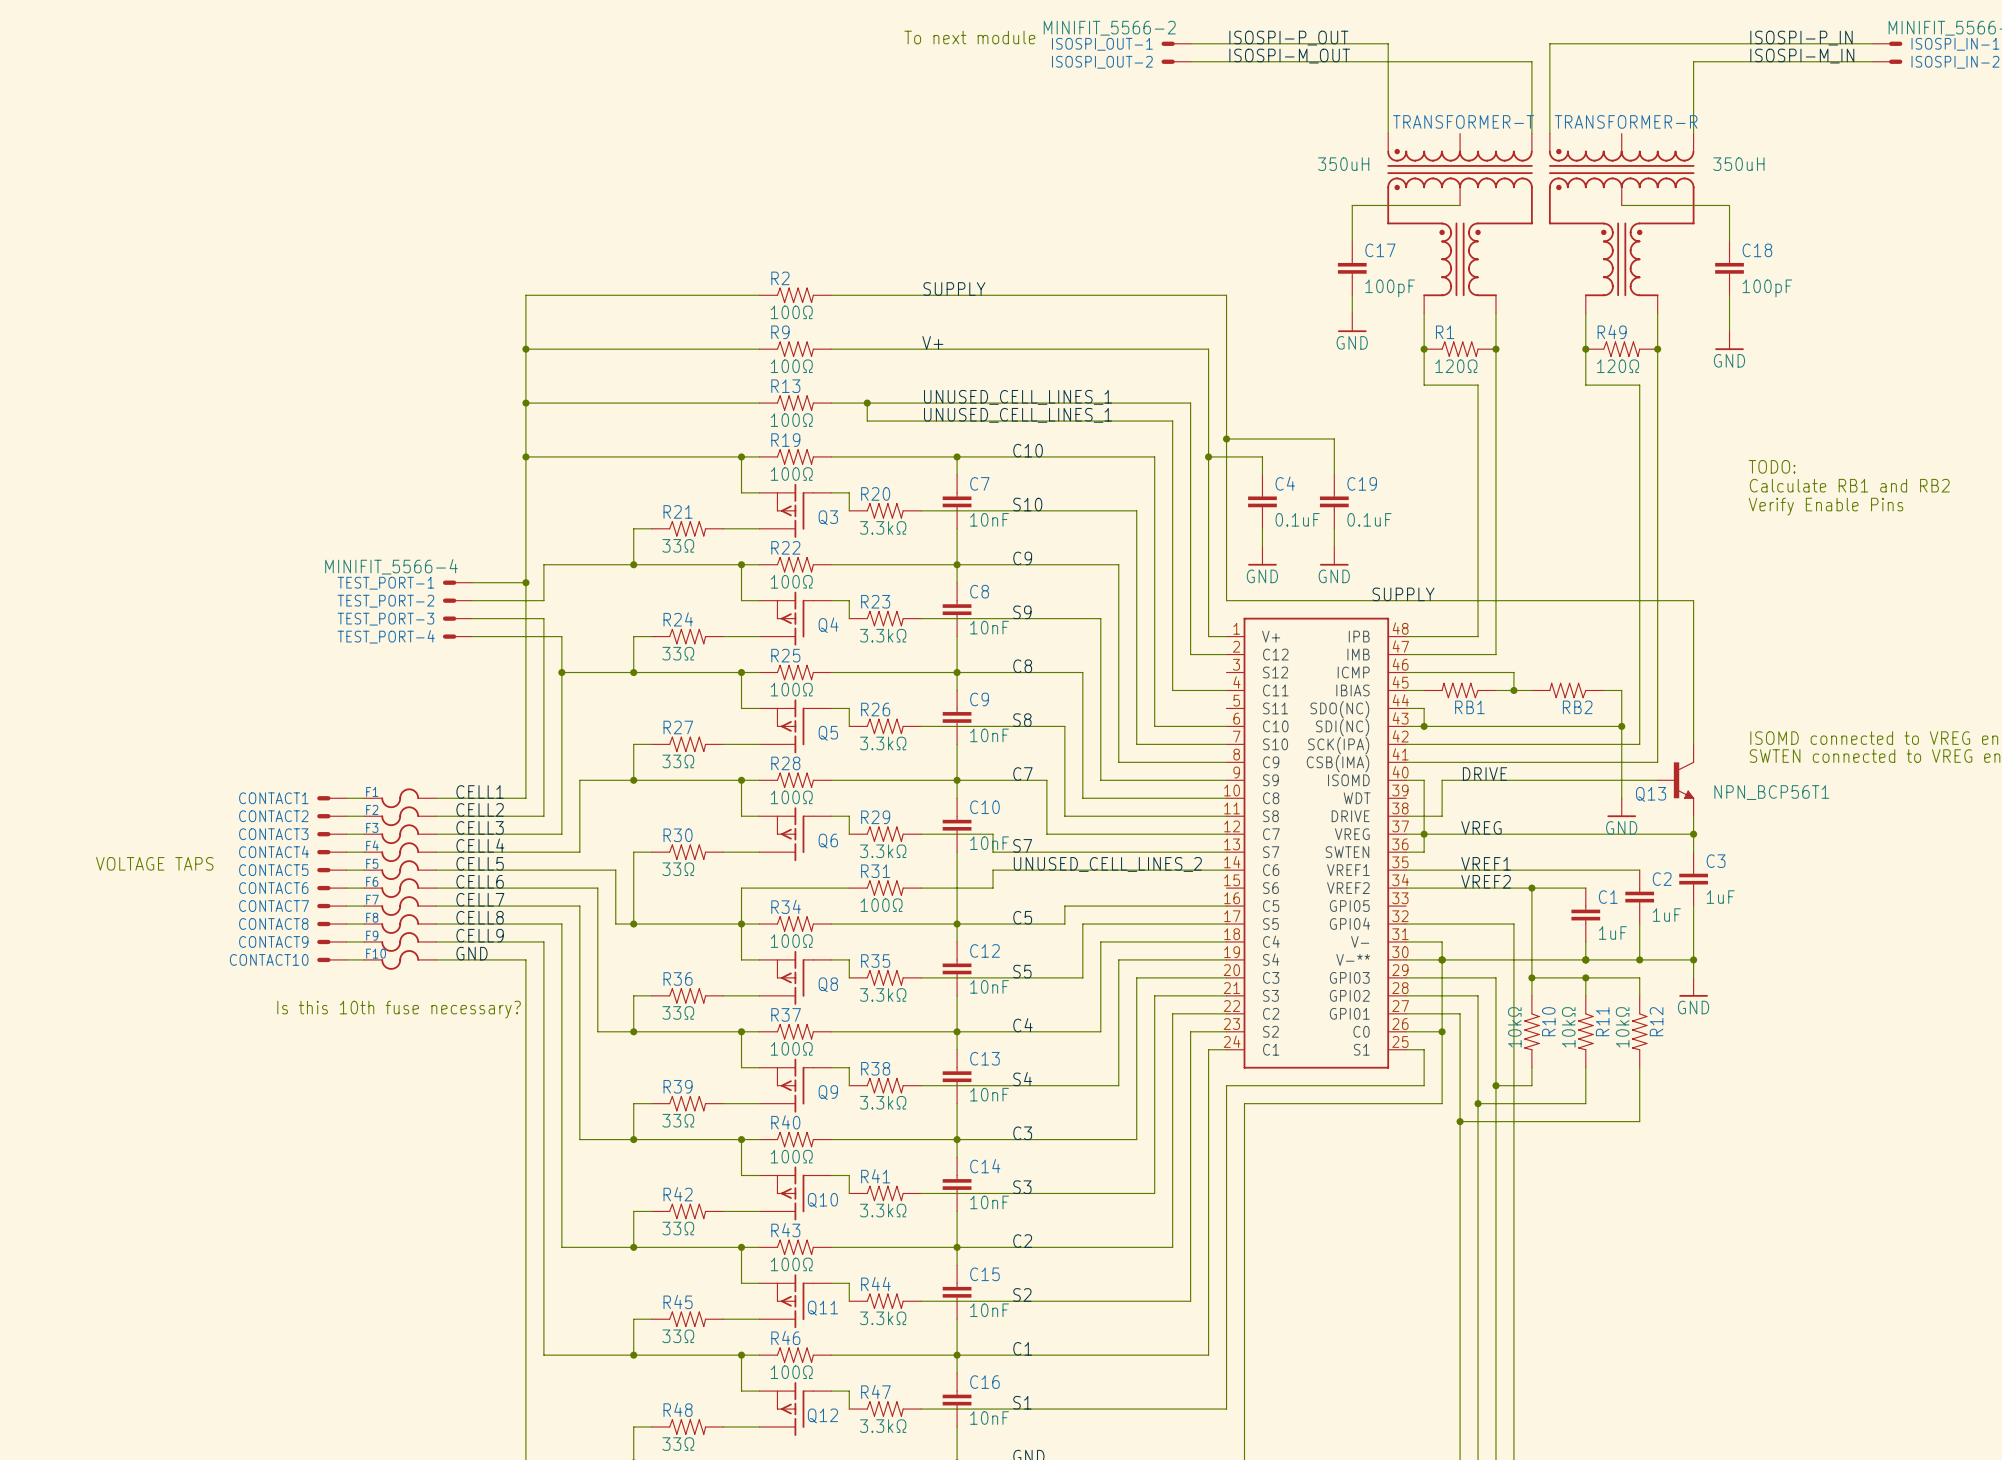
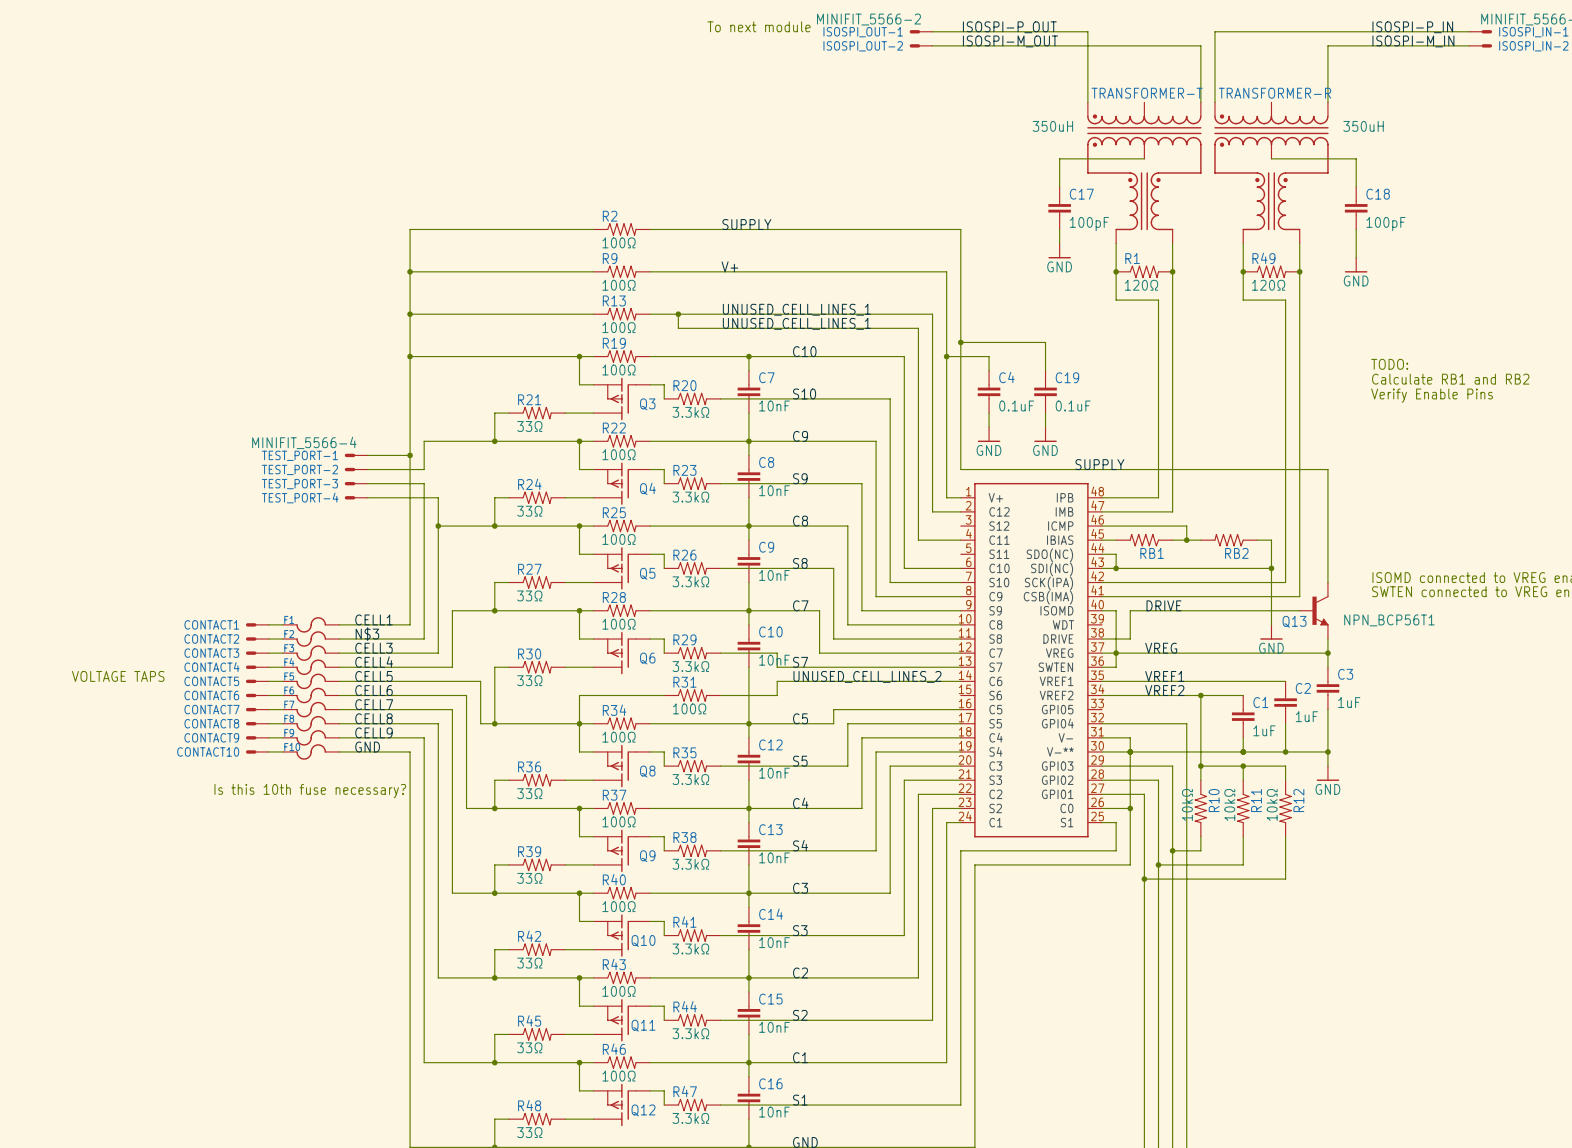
label: CELL2 (480, 809) -> N$3 (367, 634)

